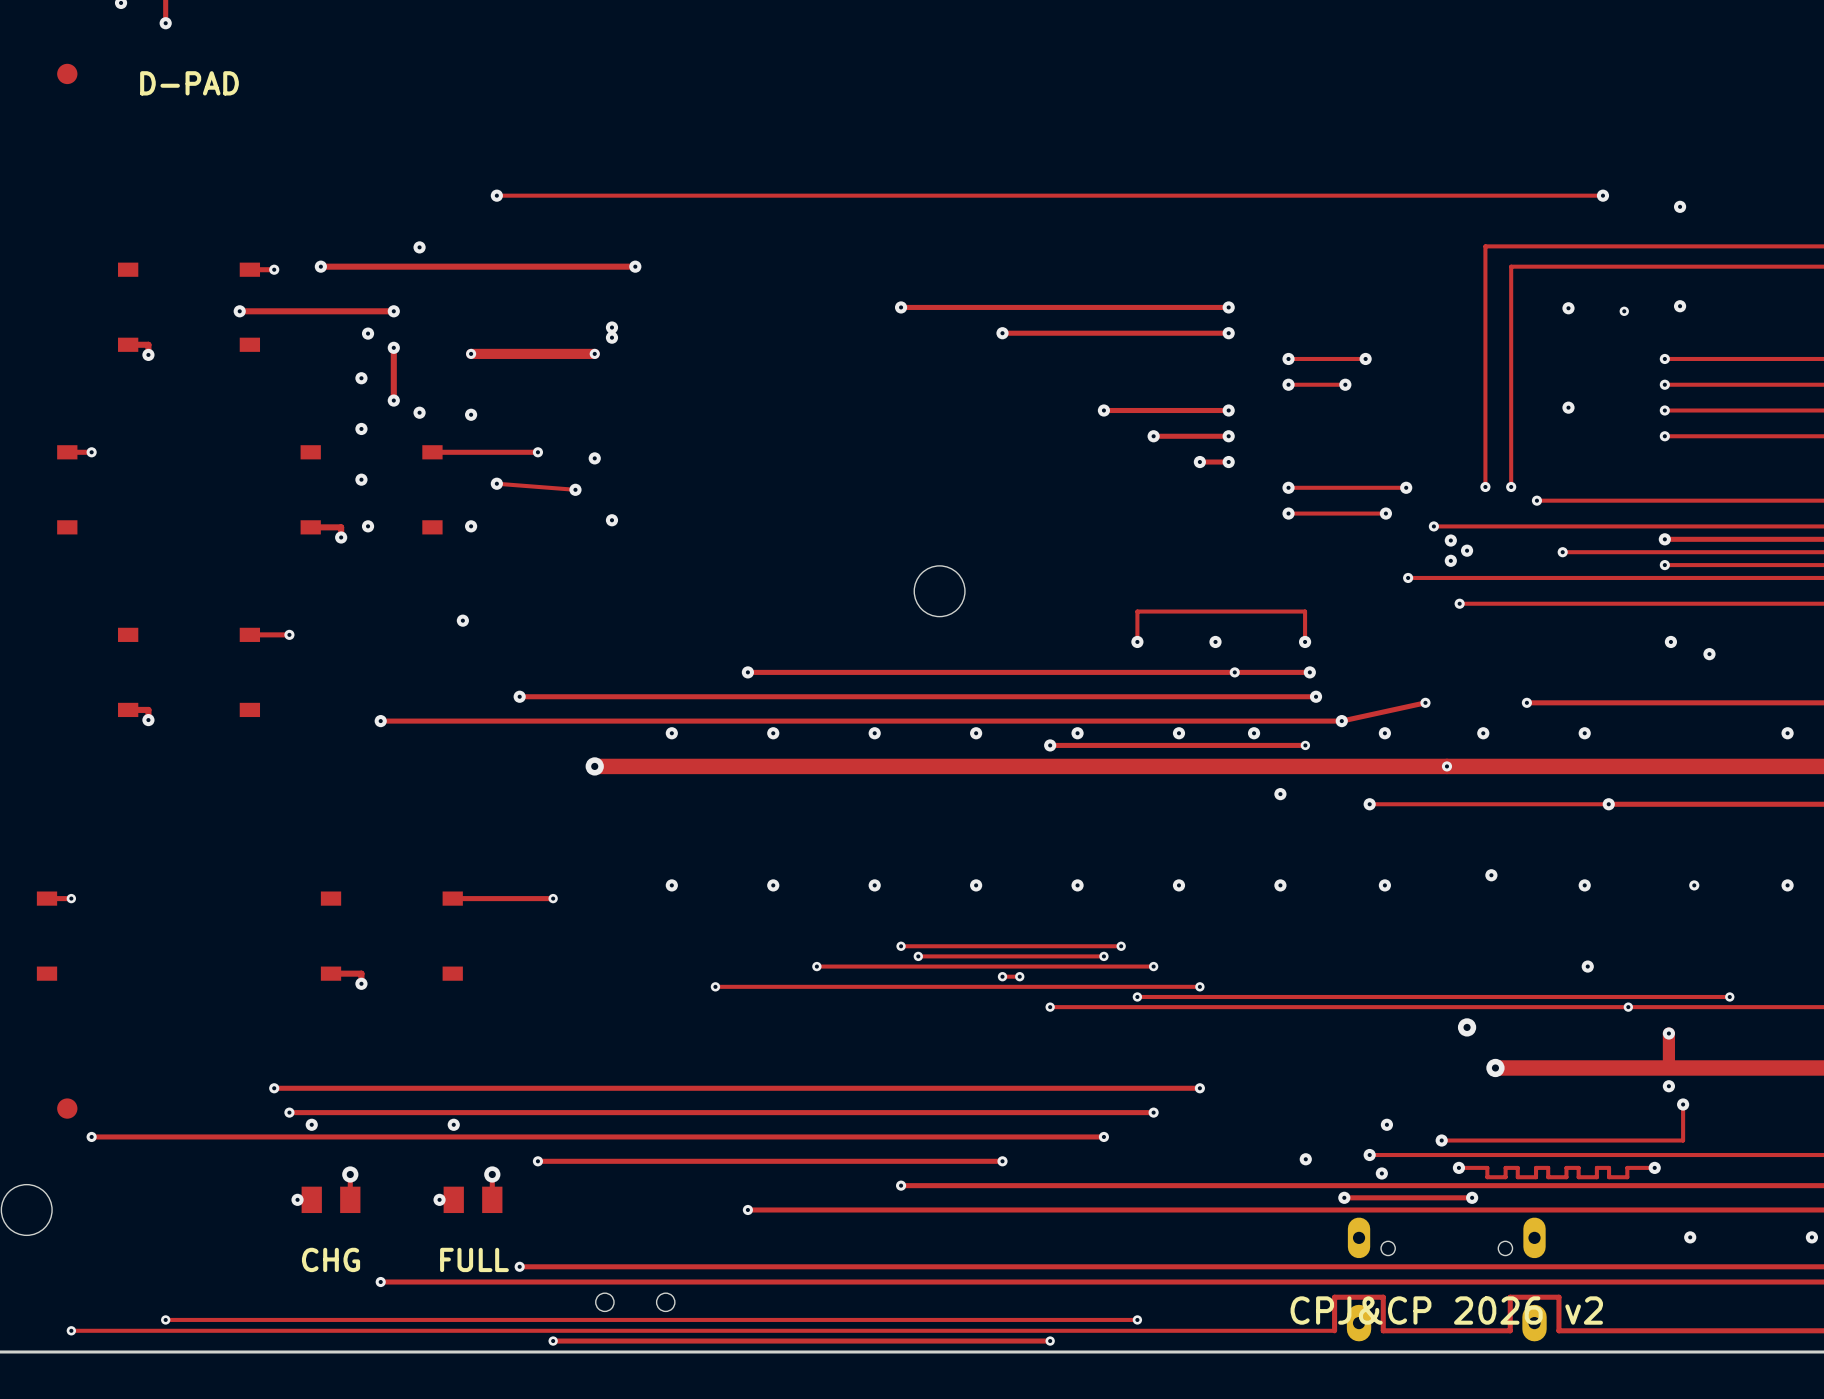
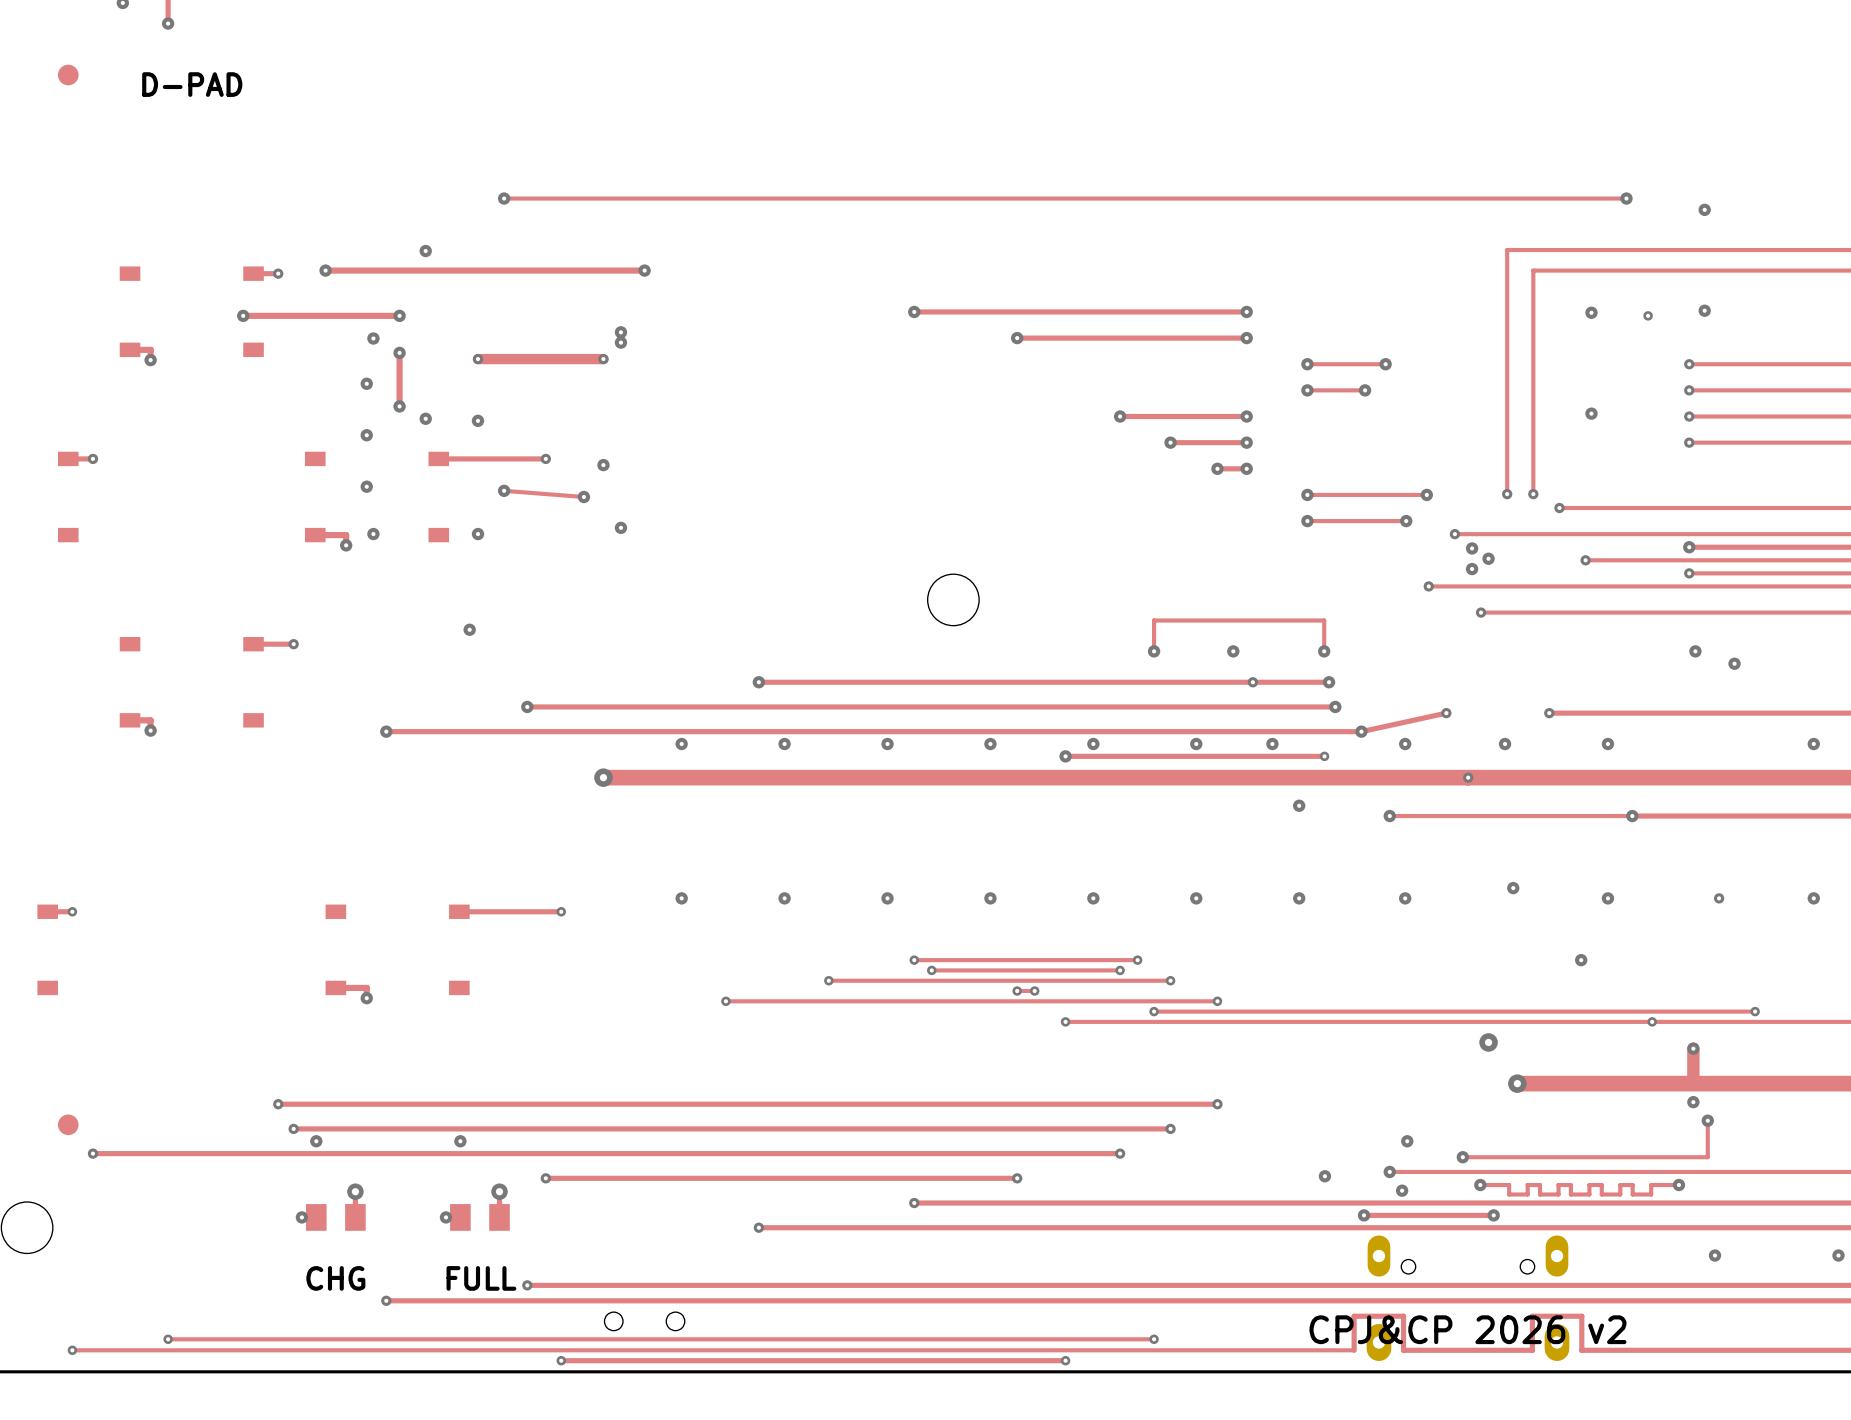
via position: (1587, 966) -> (1581, 960)

